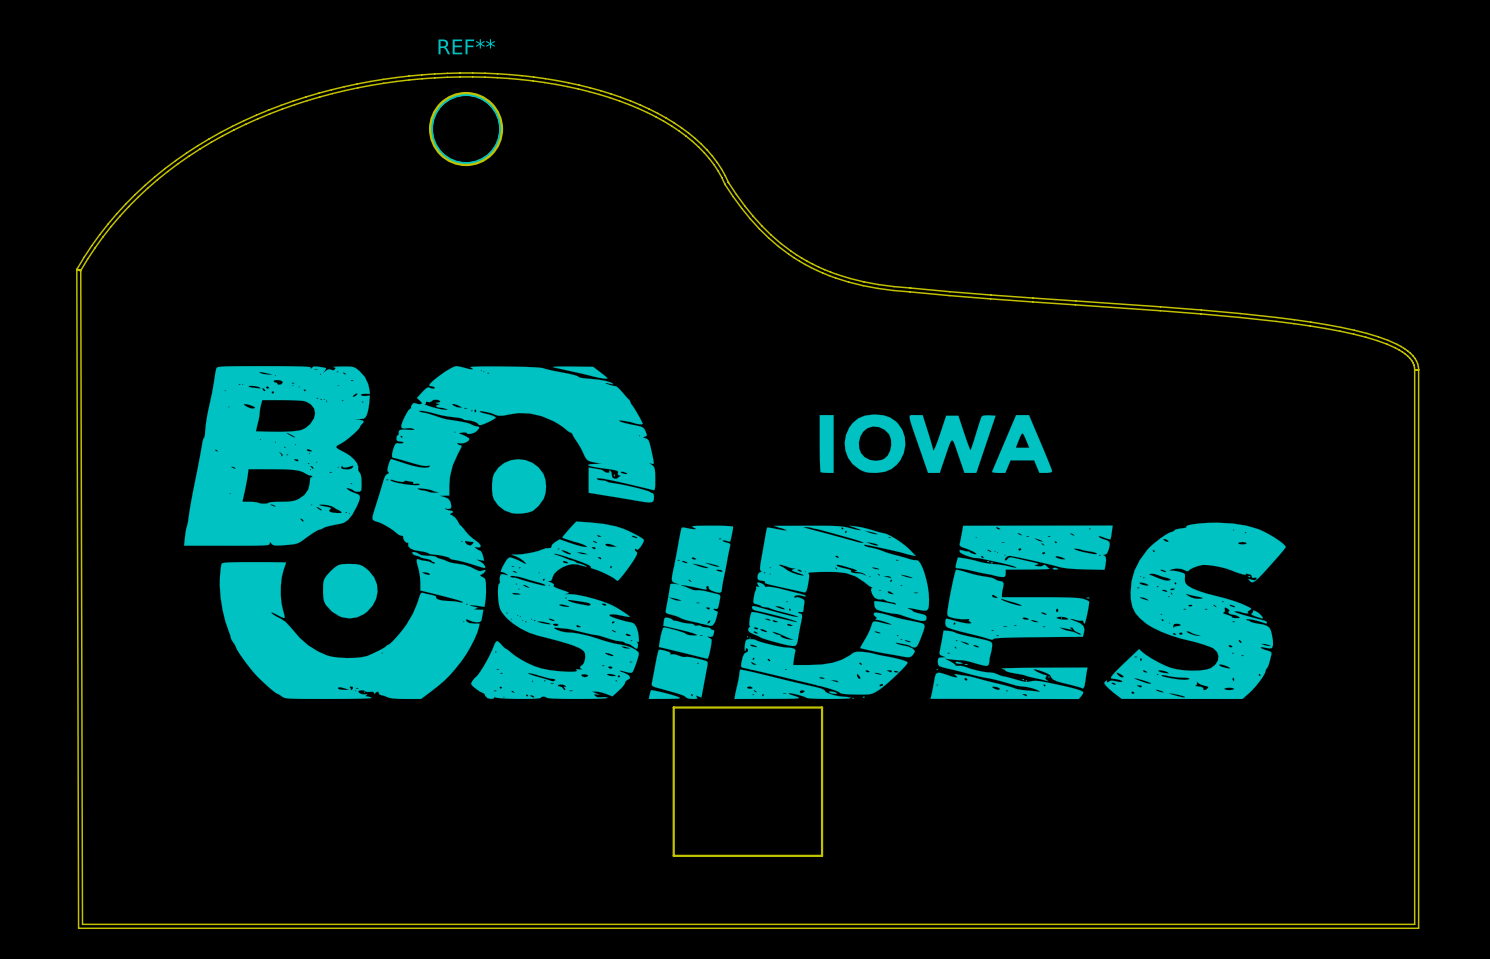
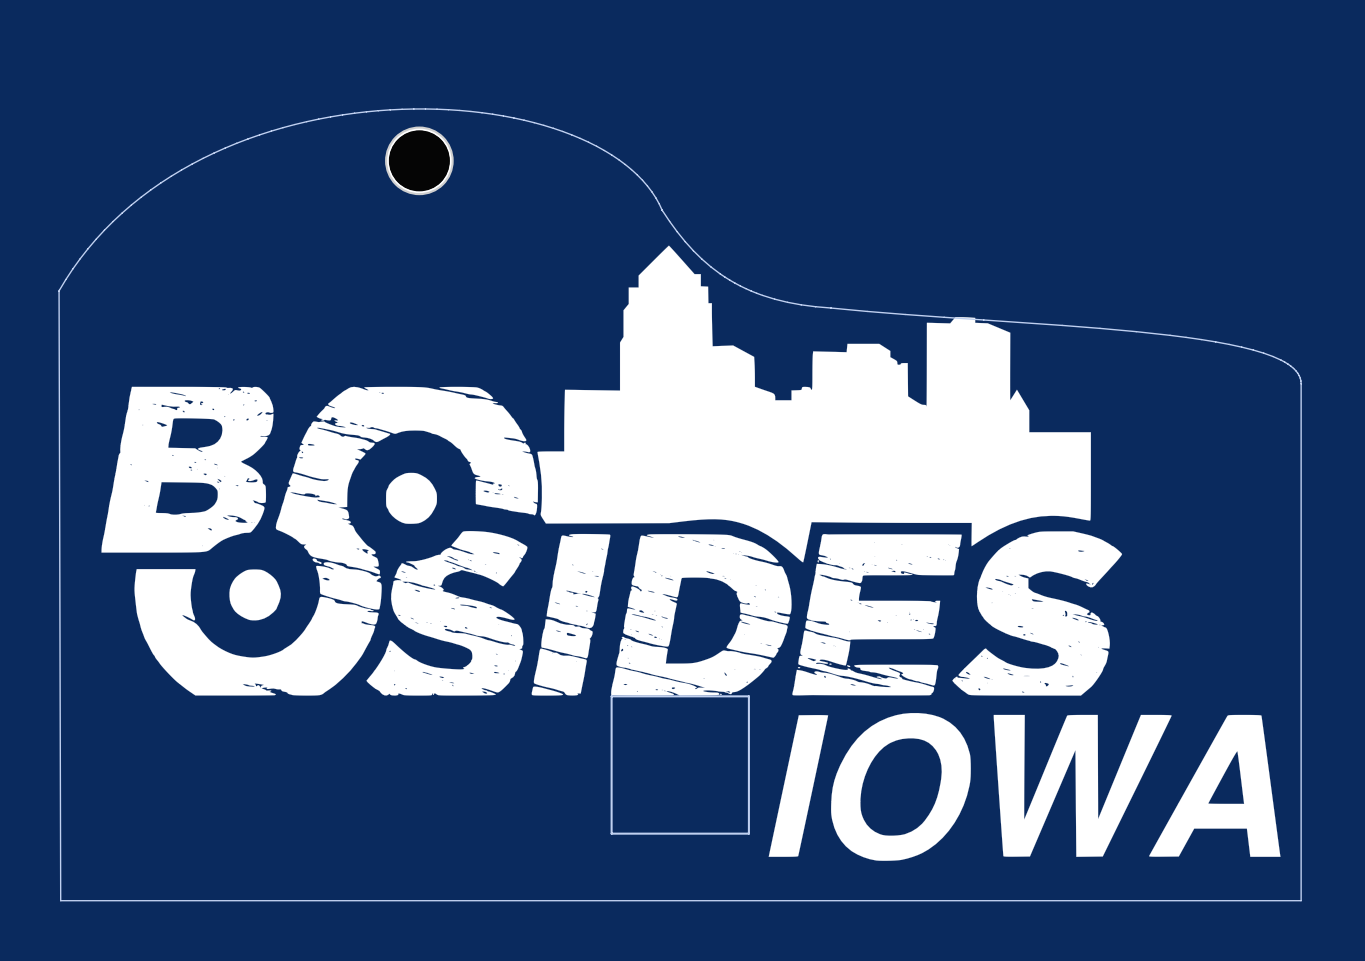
REF** name: REF** (466, 46) -> none
board edge: (724, 184) (709, 158) (686, 136) (655, 116) (609, 97) (556, 84) (509, 78) (447, 77) (396, 81) (345, 90) (294, 104) (246, 124) (211, 142) (167, 171) (137, 197) (102, 237) (80, 270) (77, 269) -> none
board edge: (725, 184) (750, 218) (778, 246) (811, 267) (848, 282) (893, 290) (1201, 313) (1293, 323) (1365, 337) (1395, 347) (1409, 358) (1414, 369) (1418, 369) (1414, 369) (1414, 924) (82, 924) (80, 269) (76, 270) -> (59, 290) (58, 291)
drawing: none -> [101, 245, 1123, 696]
drawing: [184, 366, 1286, 700] -> none
drawing: none -> [768, 713, 1281, 861]

